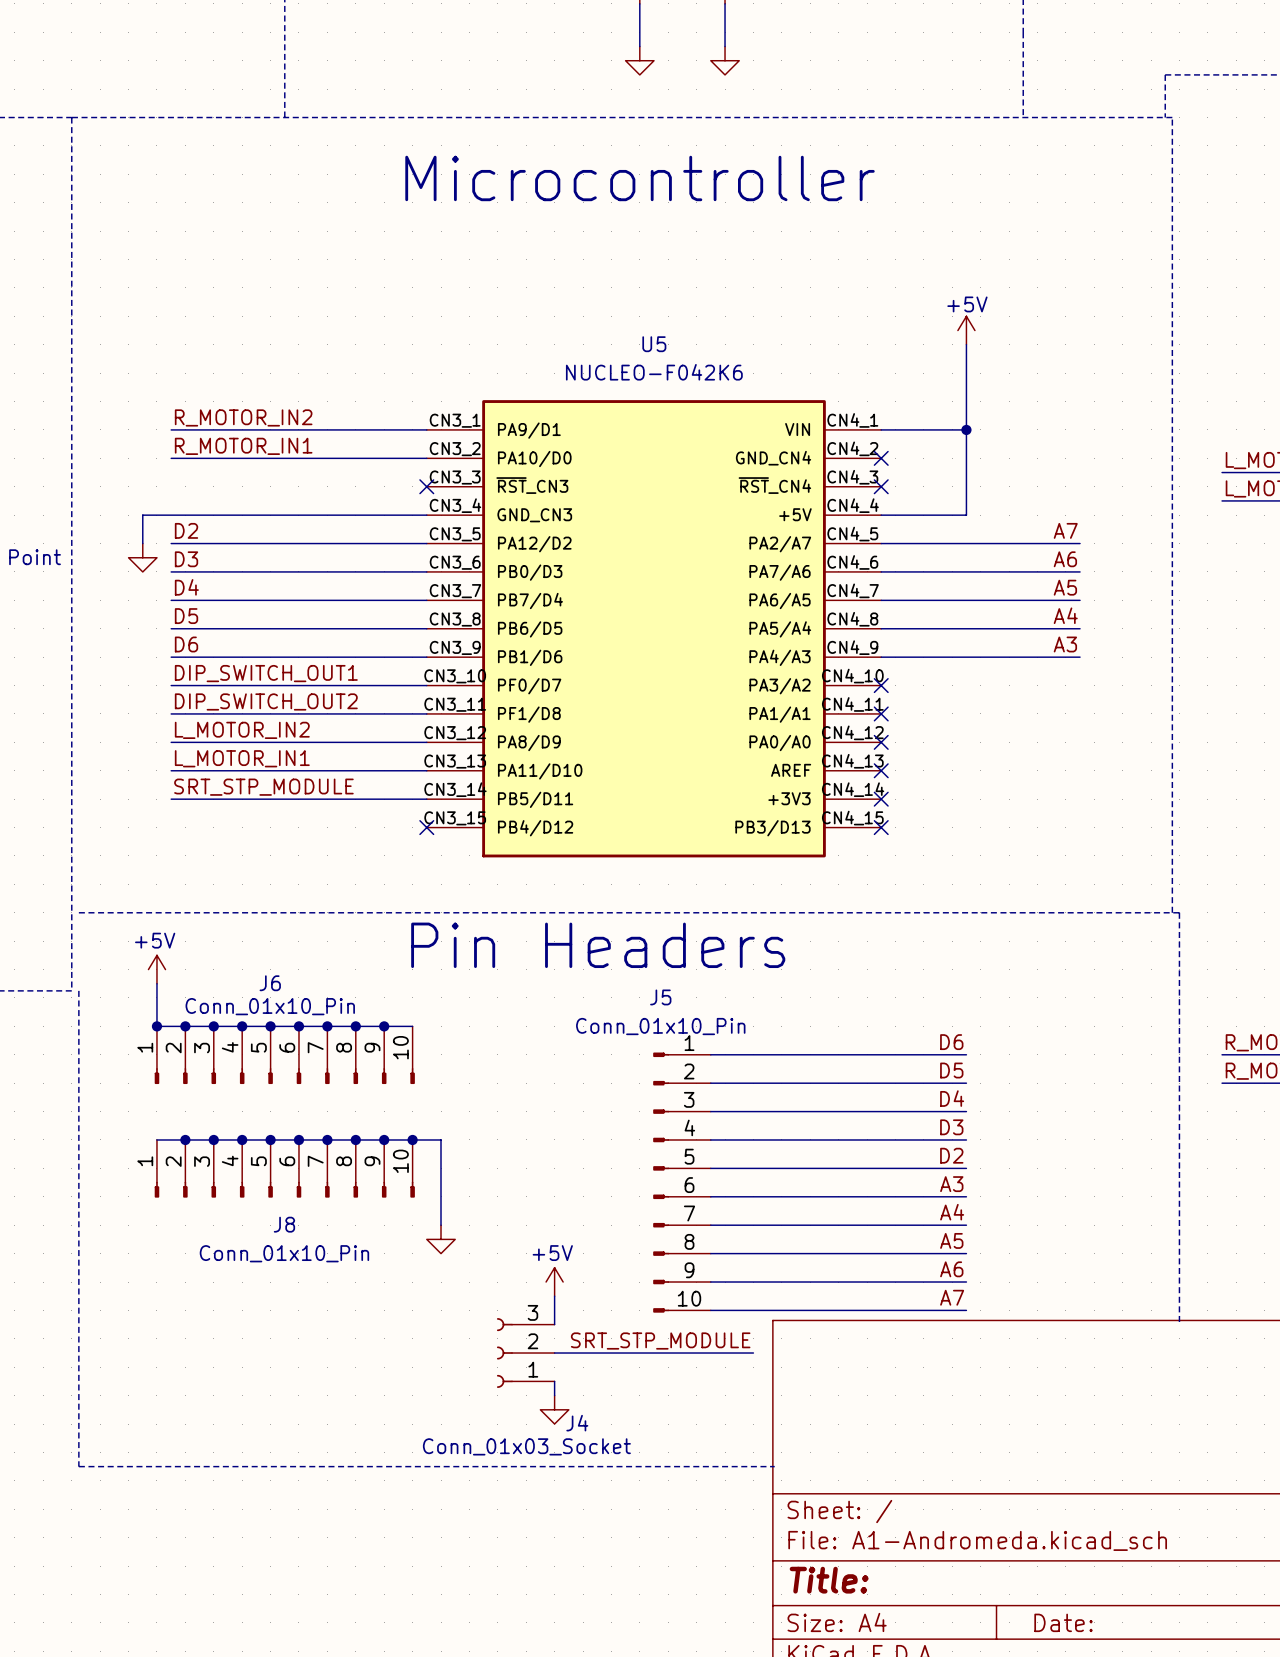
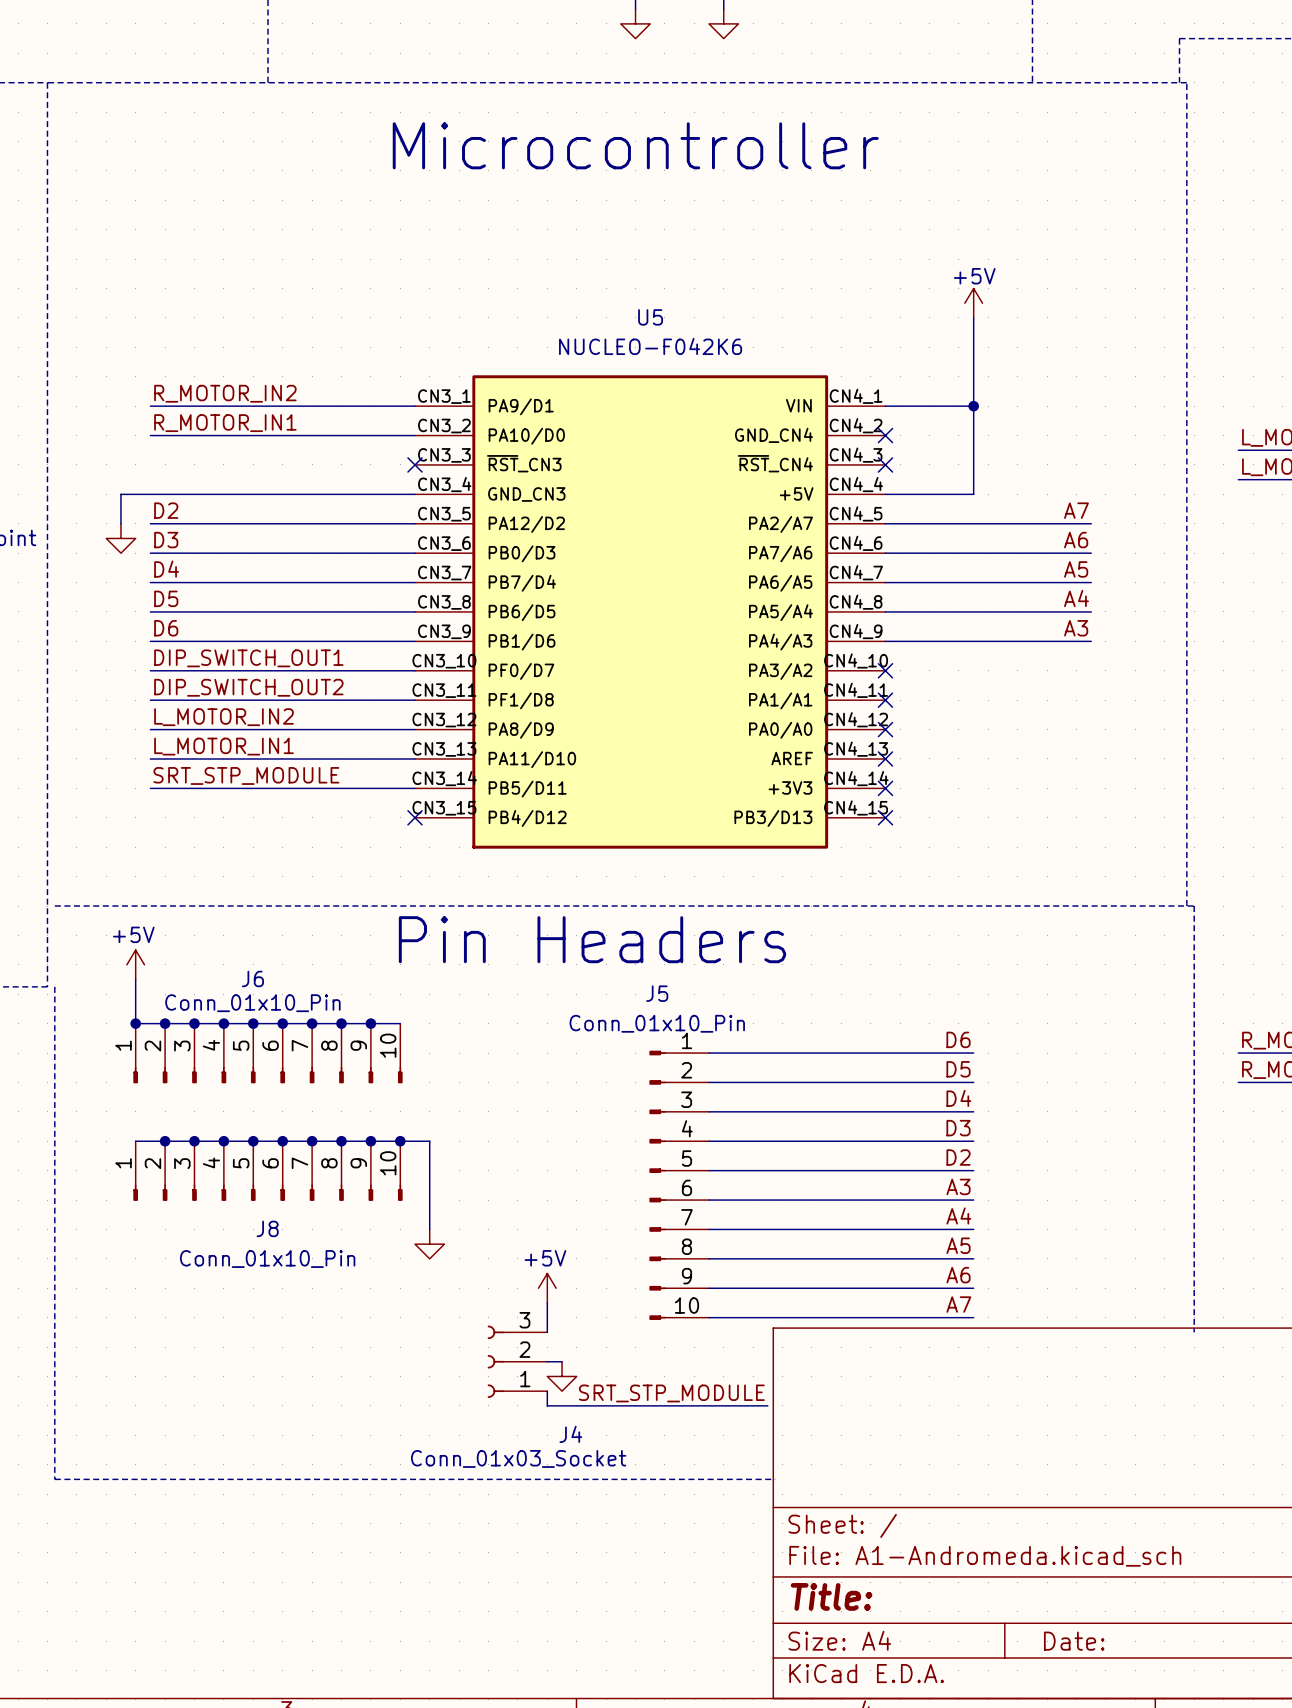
label position: SRT_STP_MODULE (660, 1341) -> SRT_STP_MODULE (671, 1393)
wire: (568, 1353) (753, 1353) -> none
wire: none -> (547, 1405) (767, 1405)
power symbol position: (554, 1409) -> (562, 1376)

